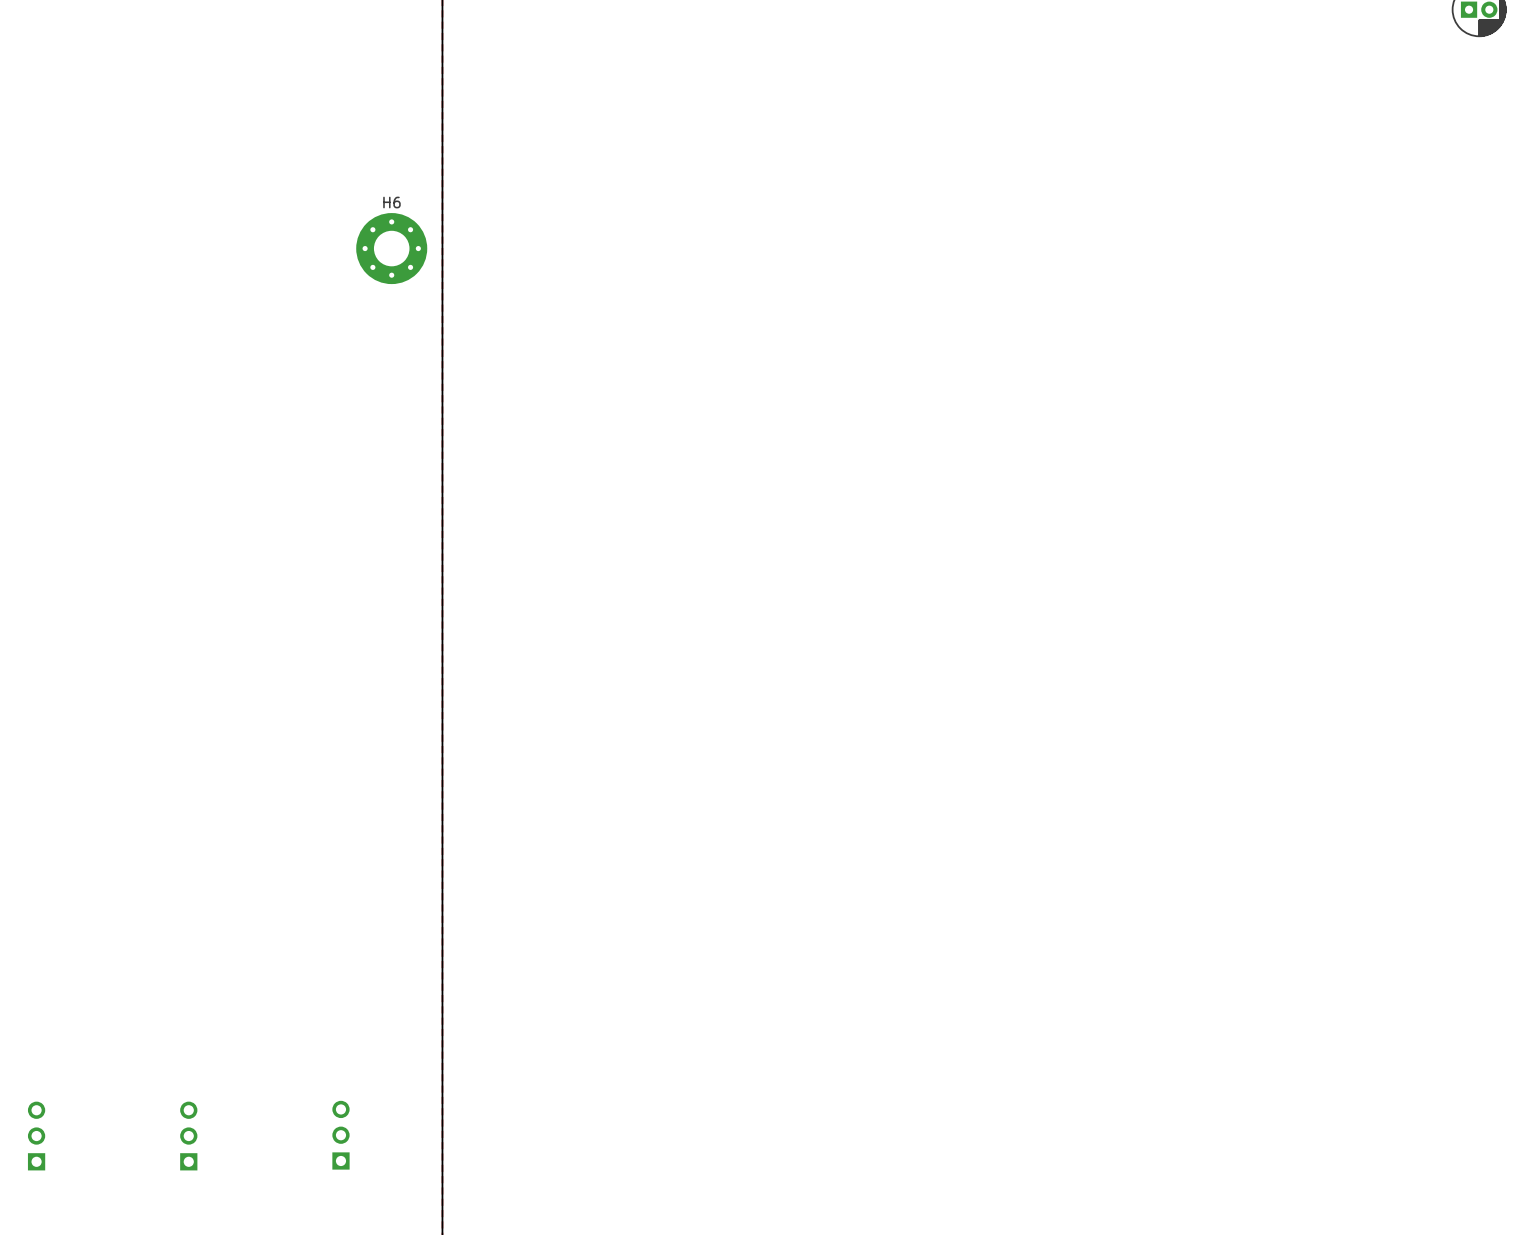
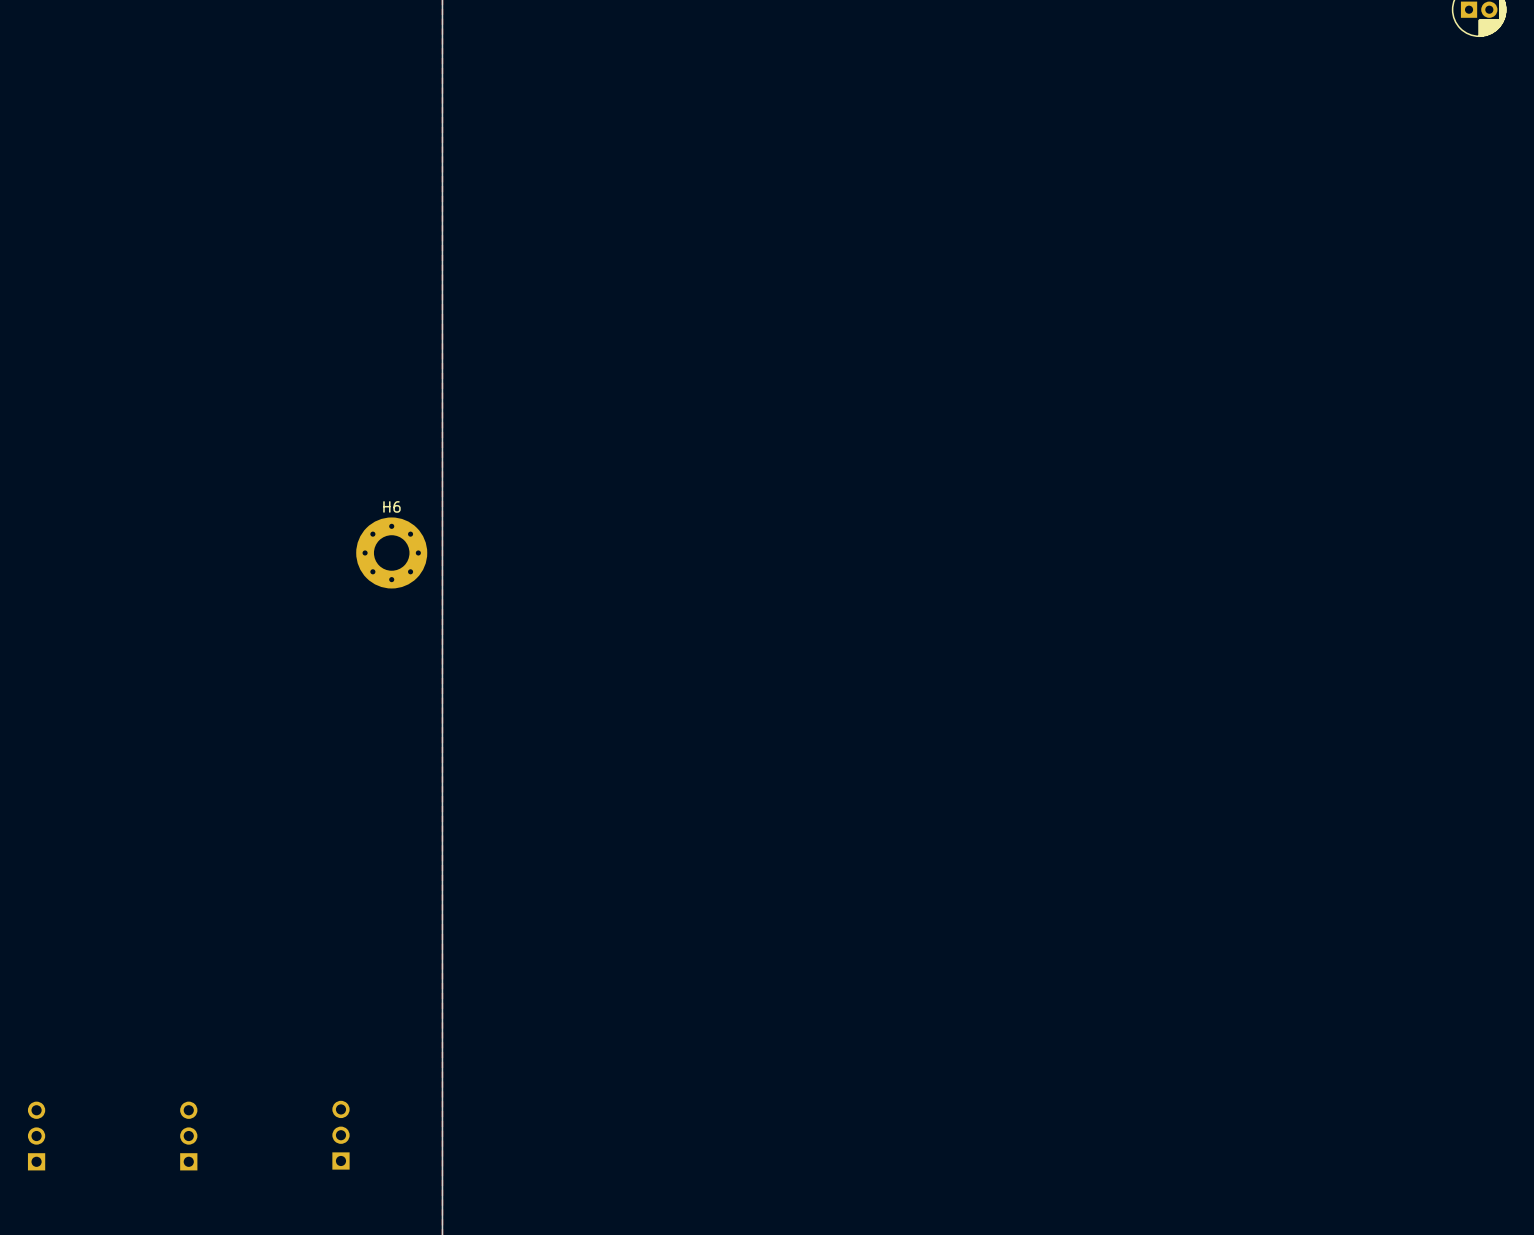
H6 position: (391, 248) -> (391, 552)

